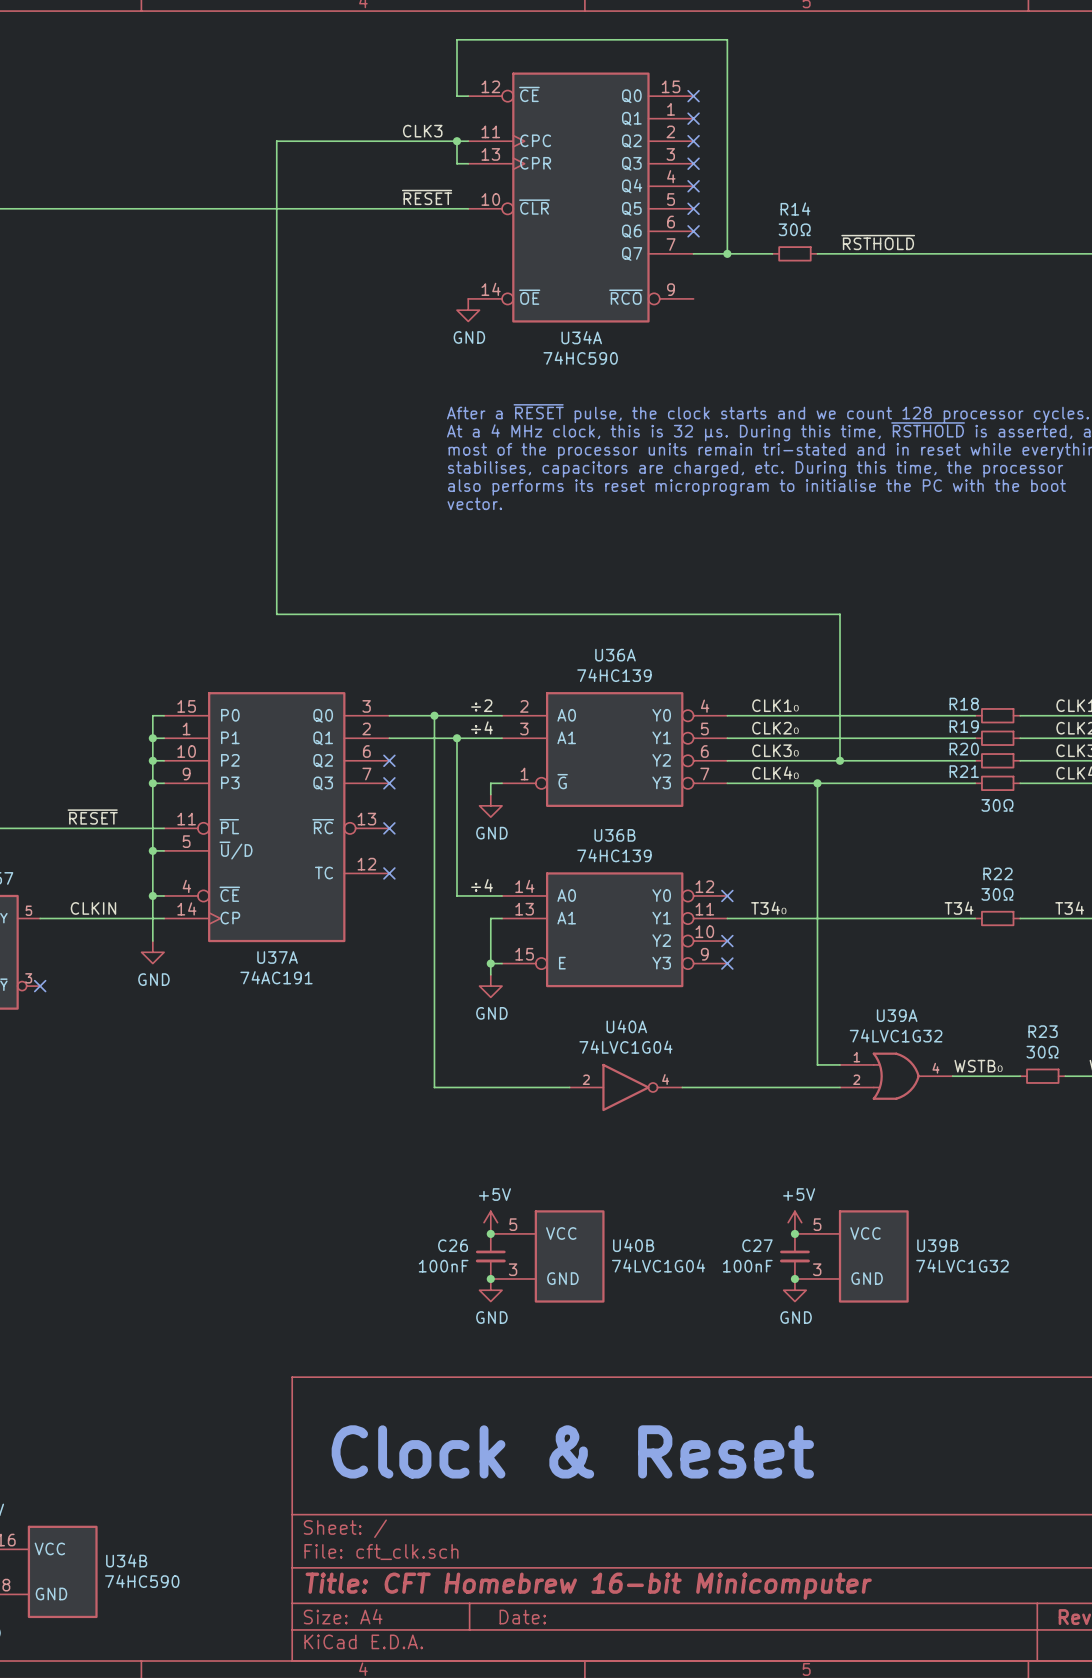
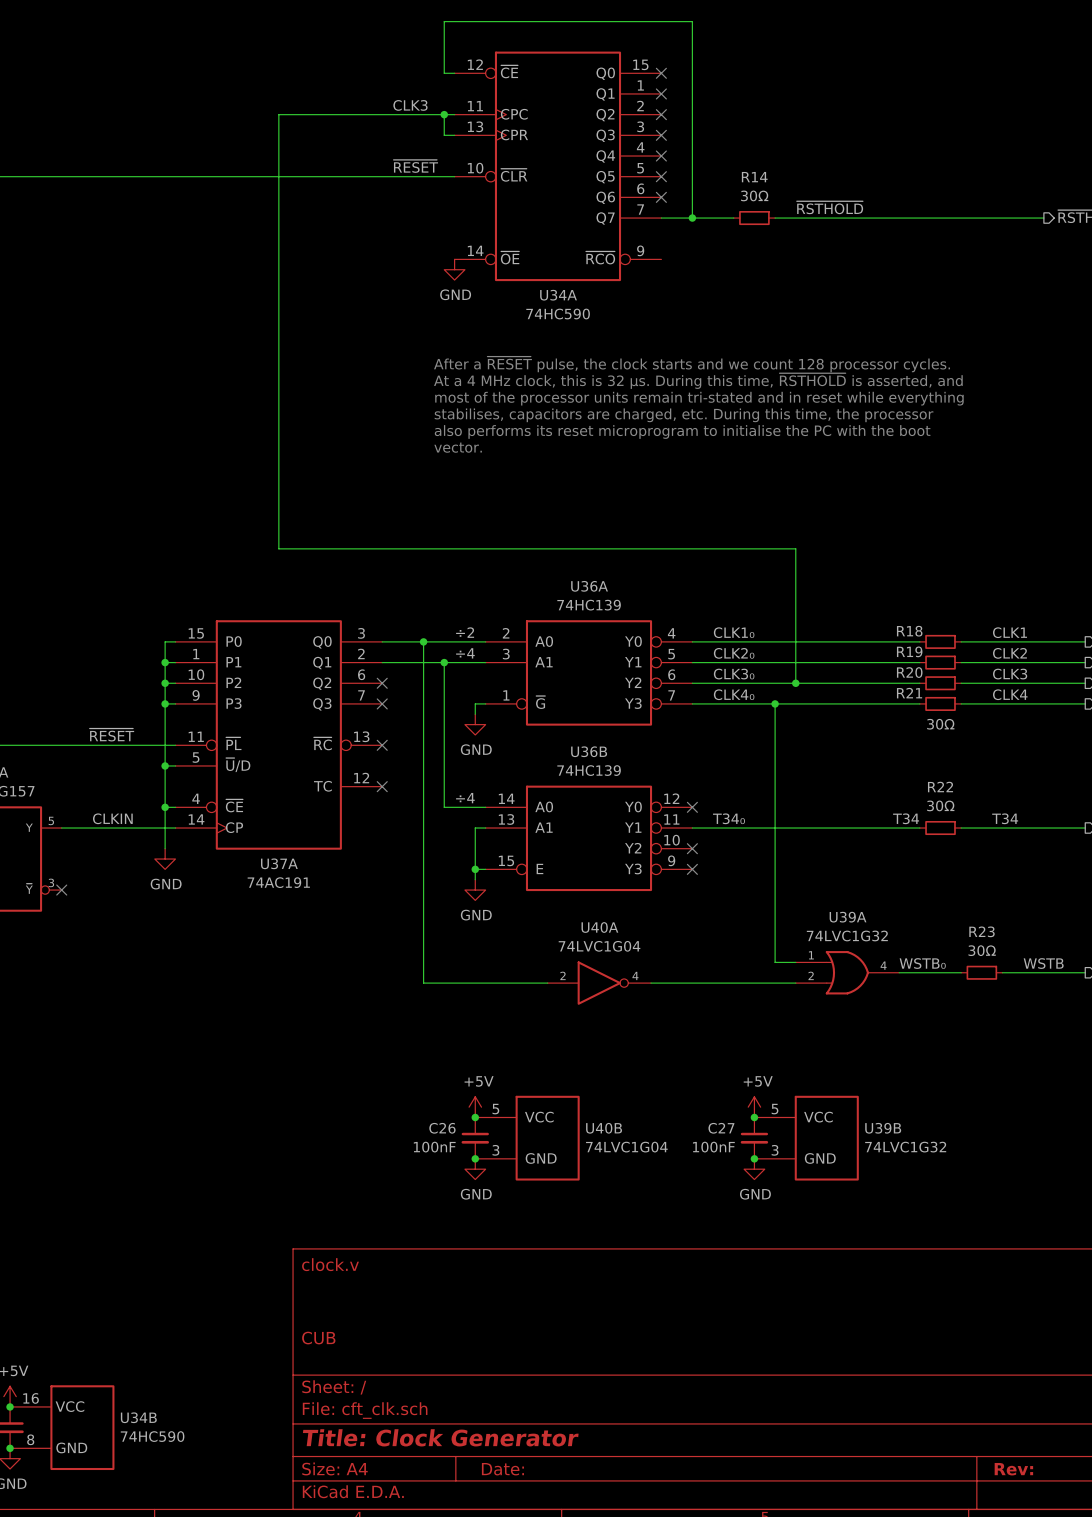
title block: none -> clock.v (330, 1264)
text: Clock & Reset (572, 1451) -> none
title block: none -> CUB (318, 1338)
title block: Title: CFT Homebrew 16-bit Minicomputer (588, 1586) -> Title: Clock Generator (440, 1437)

